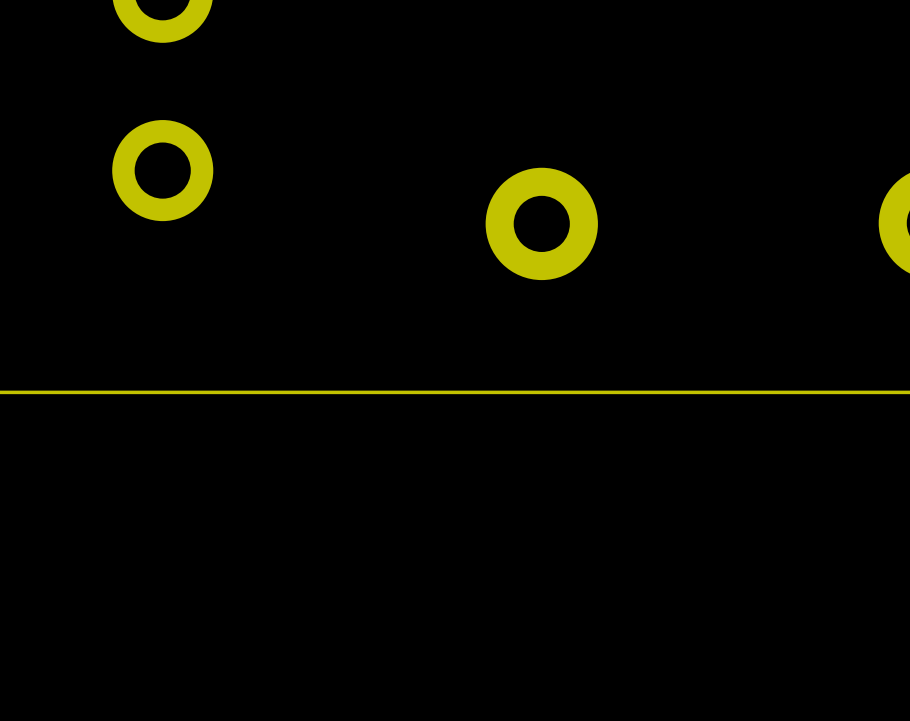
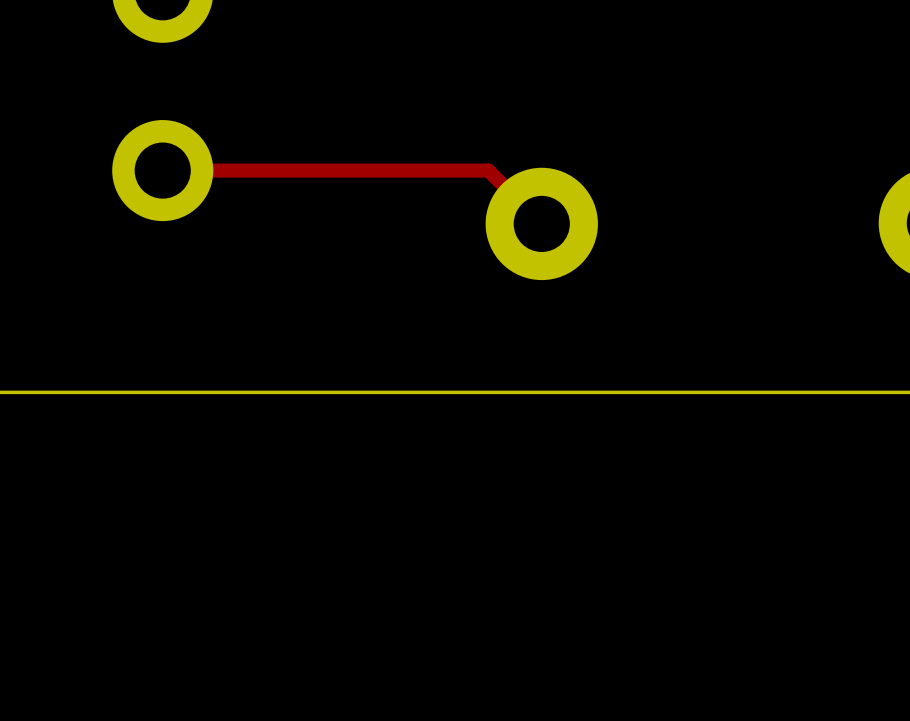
top track: none -> (162, 170) (488, 170) (541, 223)

